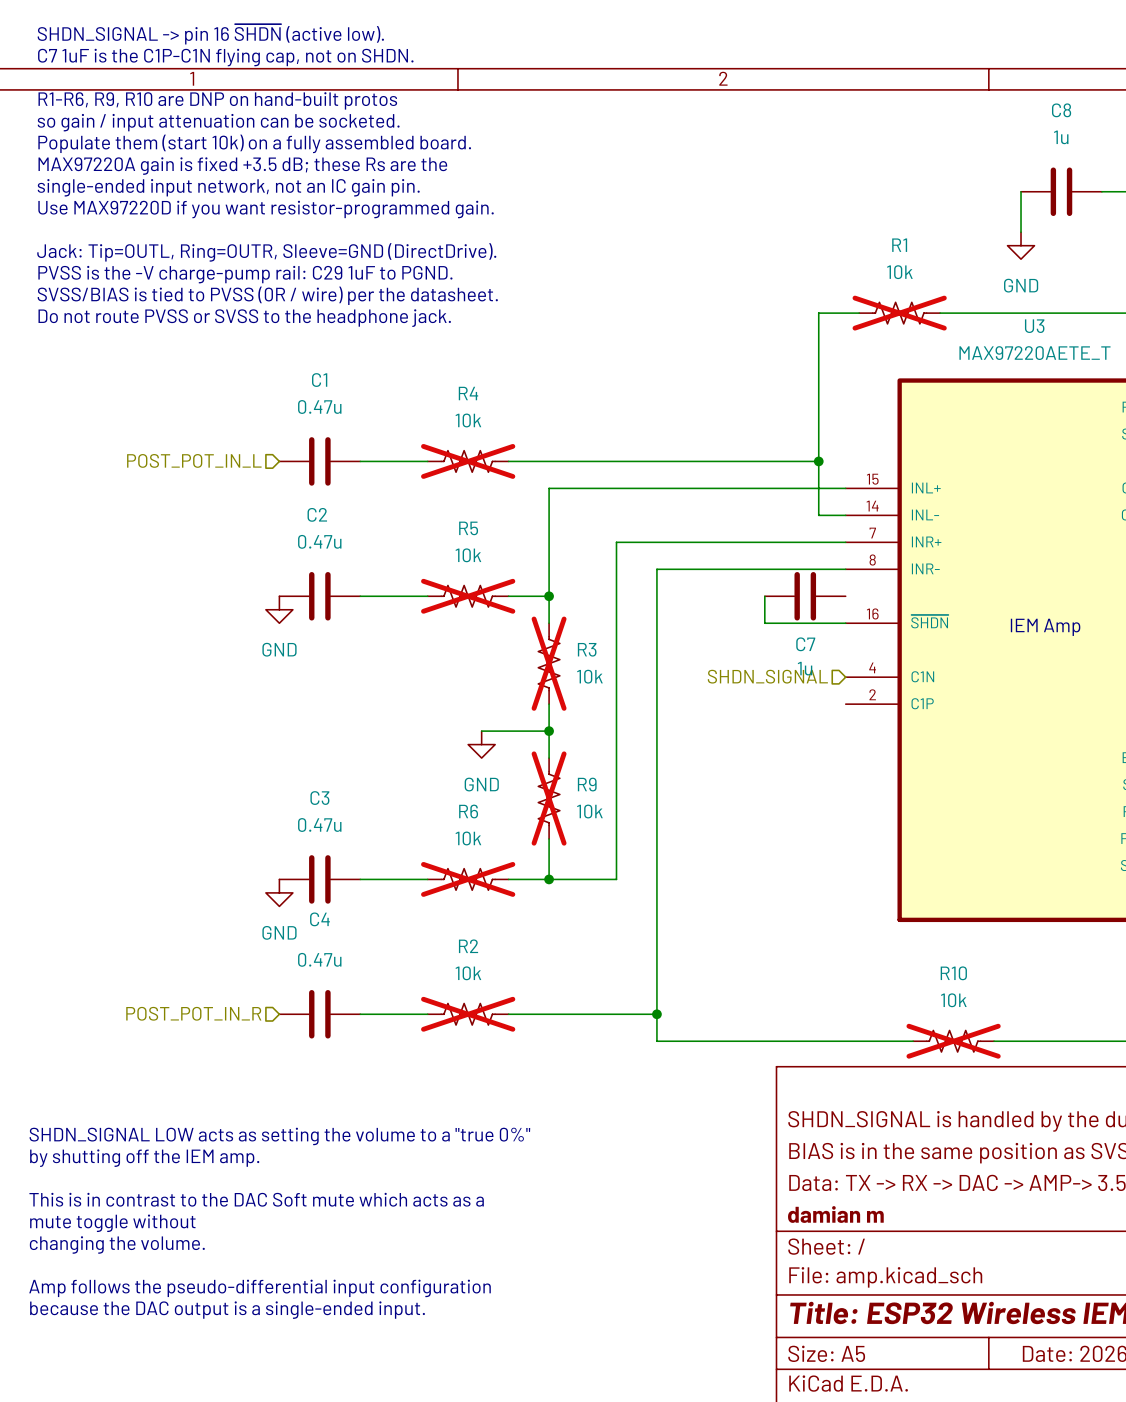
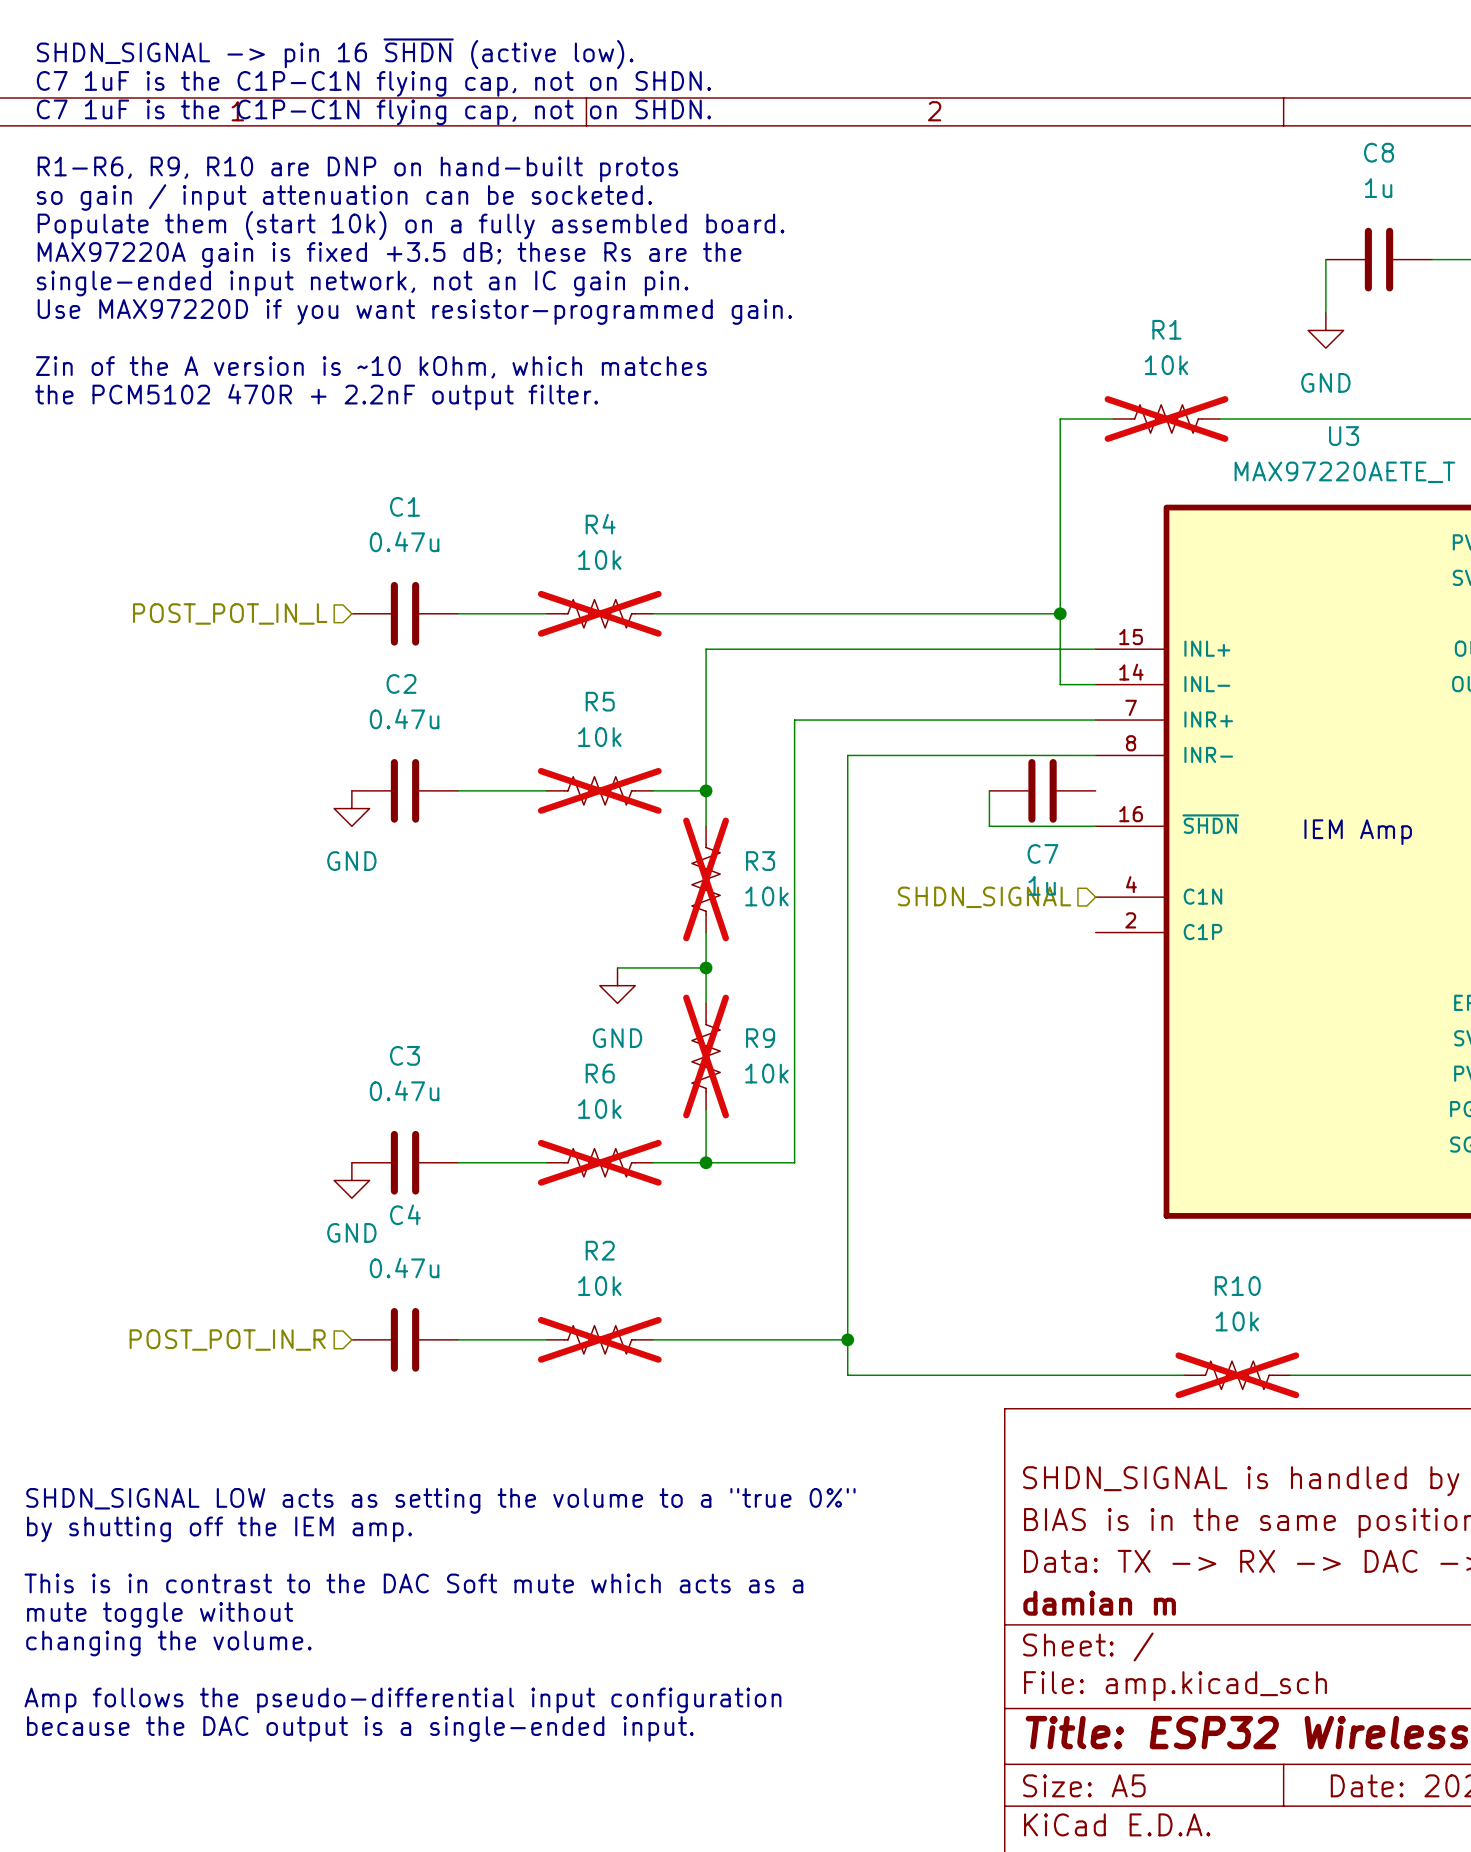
text: none -> C7 1uF is the C1P-C1N flying cap, not on SHDN. (373, 112)
text: R1-R6, R9, R10 are DNP on hand-built protos (217, 100) -> none
text: so gain / input attenuation can be socketed. (218, 122) -> R1-R6, R9, R10 are DNP on hand-built protos (357, 169)
text: Populate them (start 10k) on a fully assembled board. (254, 143) -> so gain / input attenuation can be socketed. (344, 197)
text: MAX97220A gain is fixed +3.5 dB; these Rs are the (242, 166) -> Populate them (start 10k) on a fully assembled board. (411, 225)
text: single-ended input network, not an IC gain pin. (228, 187) -> MAX97220A gain is fixed +3.5 dB; these Rs are the (389, 254)
text: Use MAX97220D if you want resistor-programmed gain. (266, 209) -> single-ended input network, not an IC gain pin. (362, 283)
text: none -> Use MAX97220D if you want resistor-programmed gain. (414, 311)
text: Jack: Tip=OUTL, Ring=OUTR, Sleeve=GND (DirectDrive). (266, 252) -> none
text: PVSS is the -V charge-pump rail: C29 1uF to PGND. (245, 274) -> Zin of the A version is ~10 kOhm, which matches (371, 367)
text: SVSS/BIAS is tied to PVSS (0R / wire) per the datasheet. (267, 295) -> the PCM5102 470R + 2.2nF output filter. (316, 397)
text: Do not route PVSS or SVSS to the headphone jack. (244, 318) -> none

